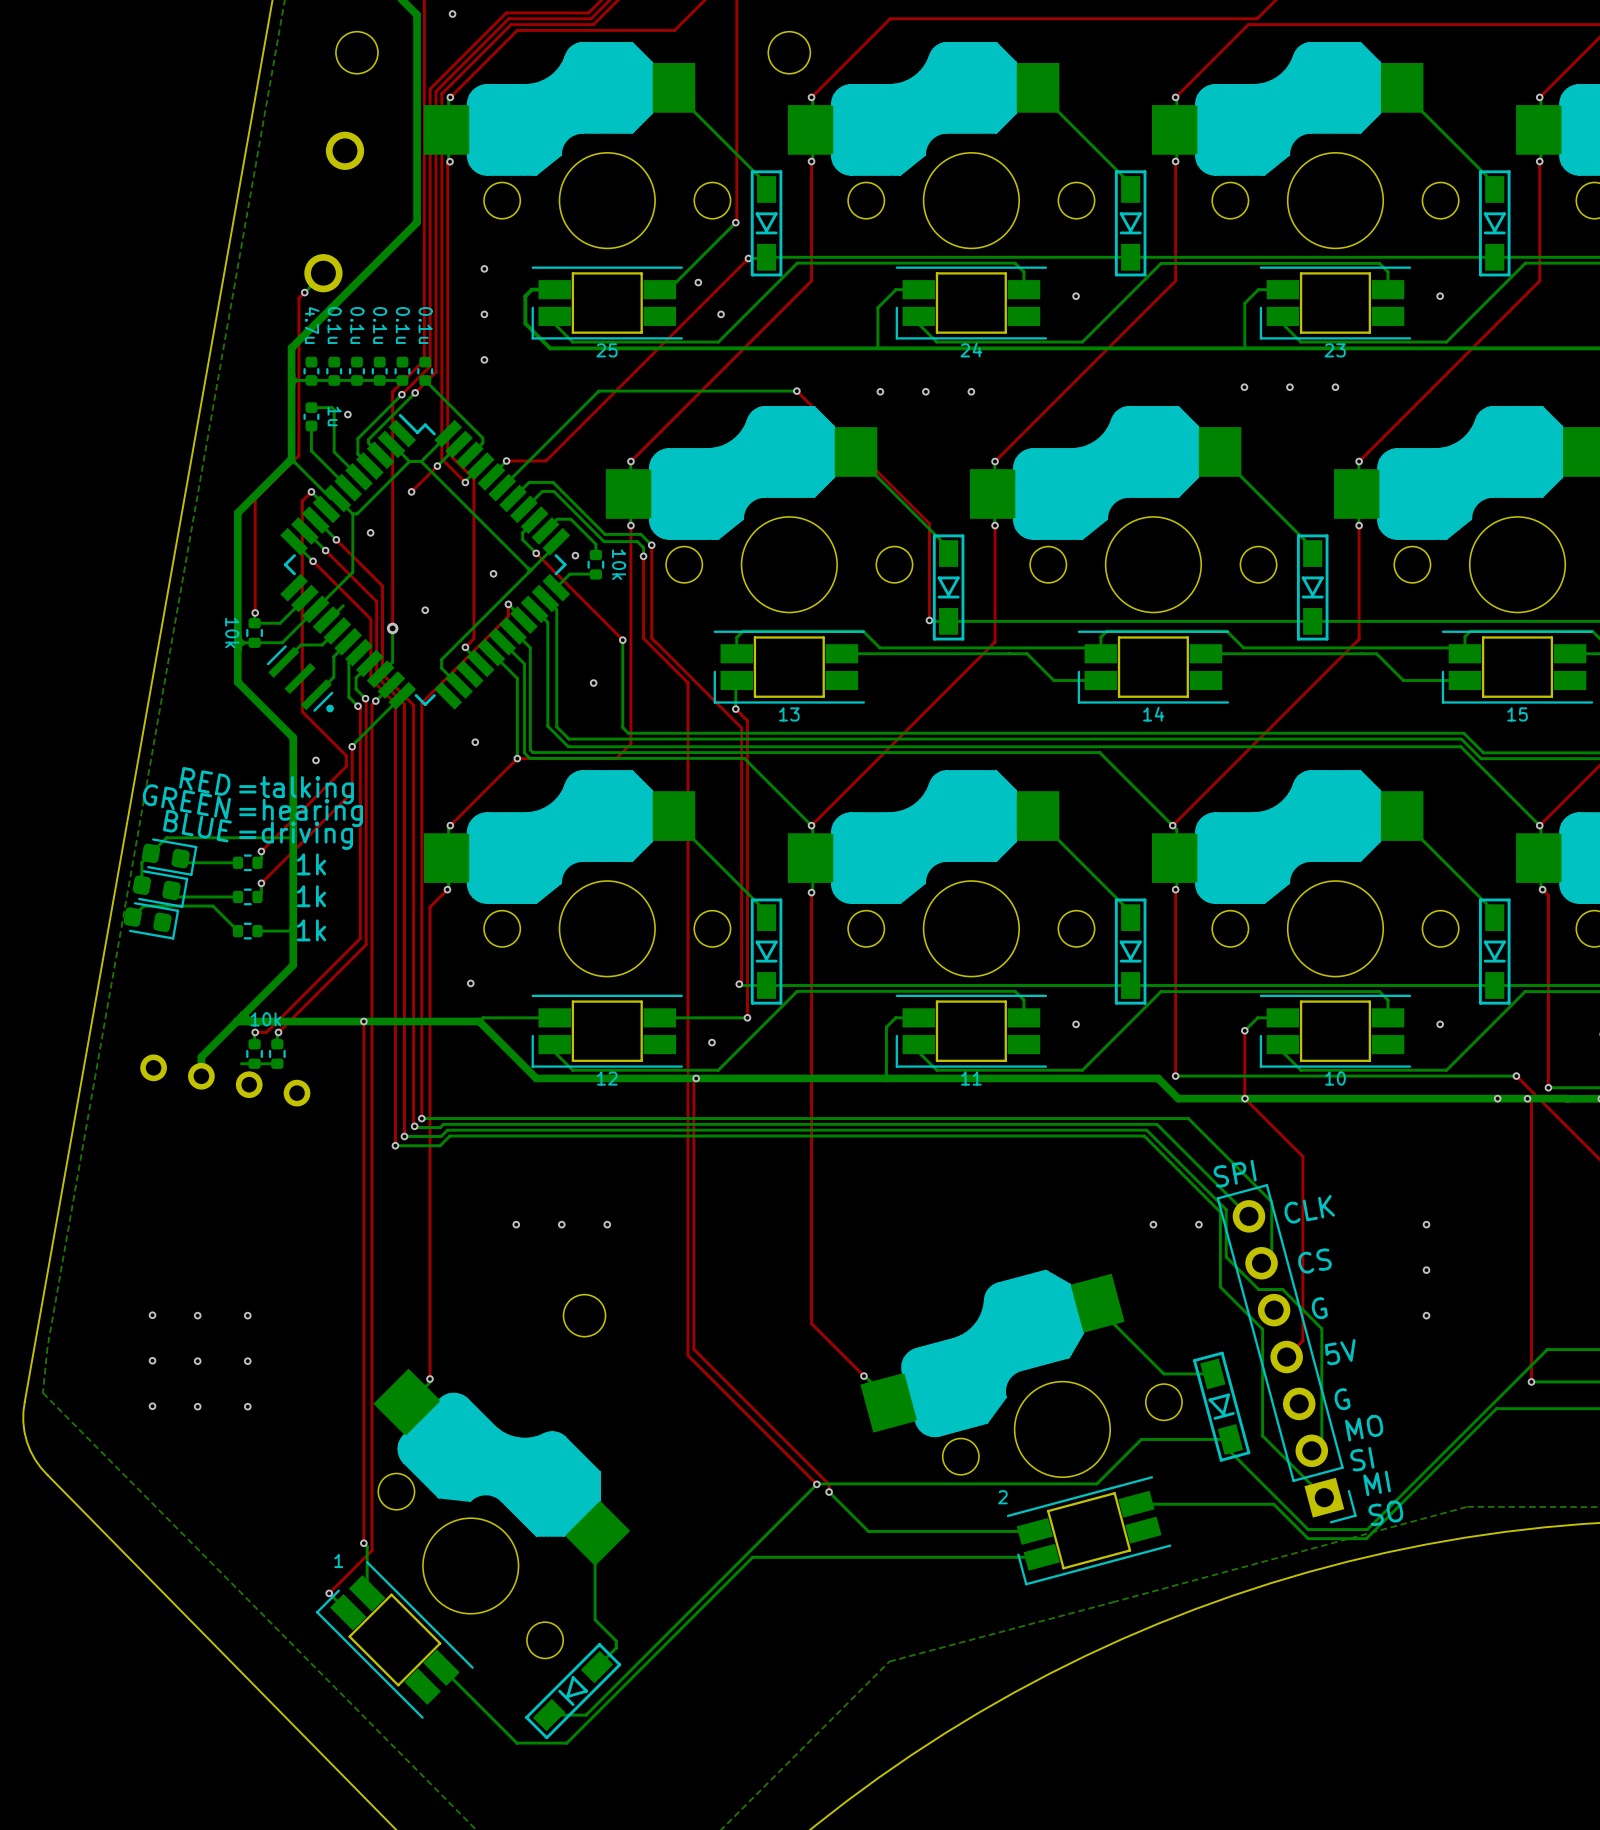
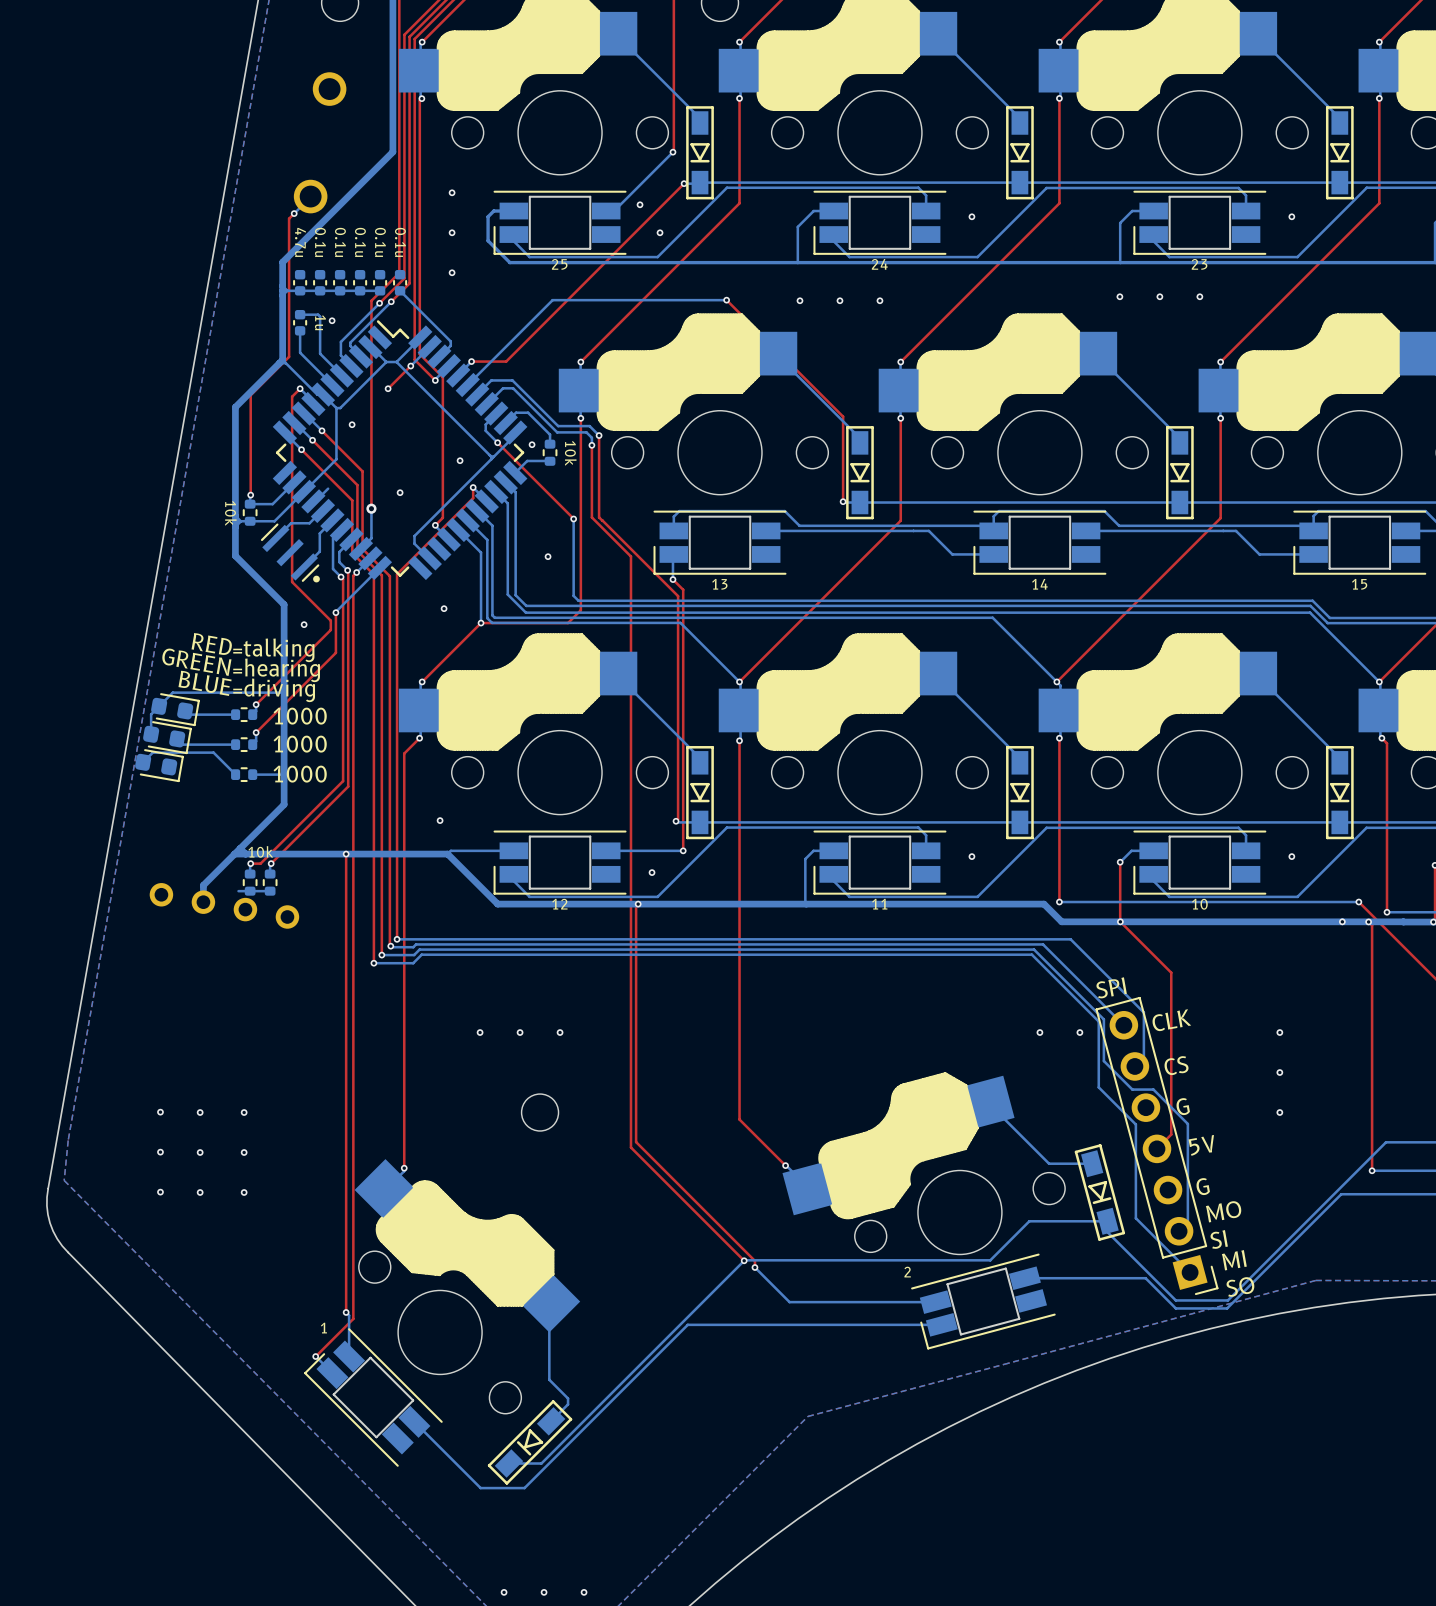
part value: 1k (311, 864) -> 1000 (300, 716)
part value: 1k (311, 896) -> 1000 (300, 744)
part value: 1k (311, 930) -> 1000 (300, 774)

